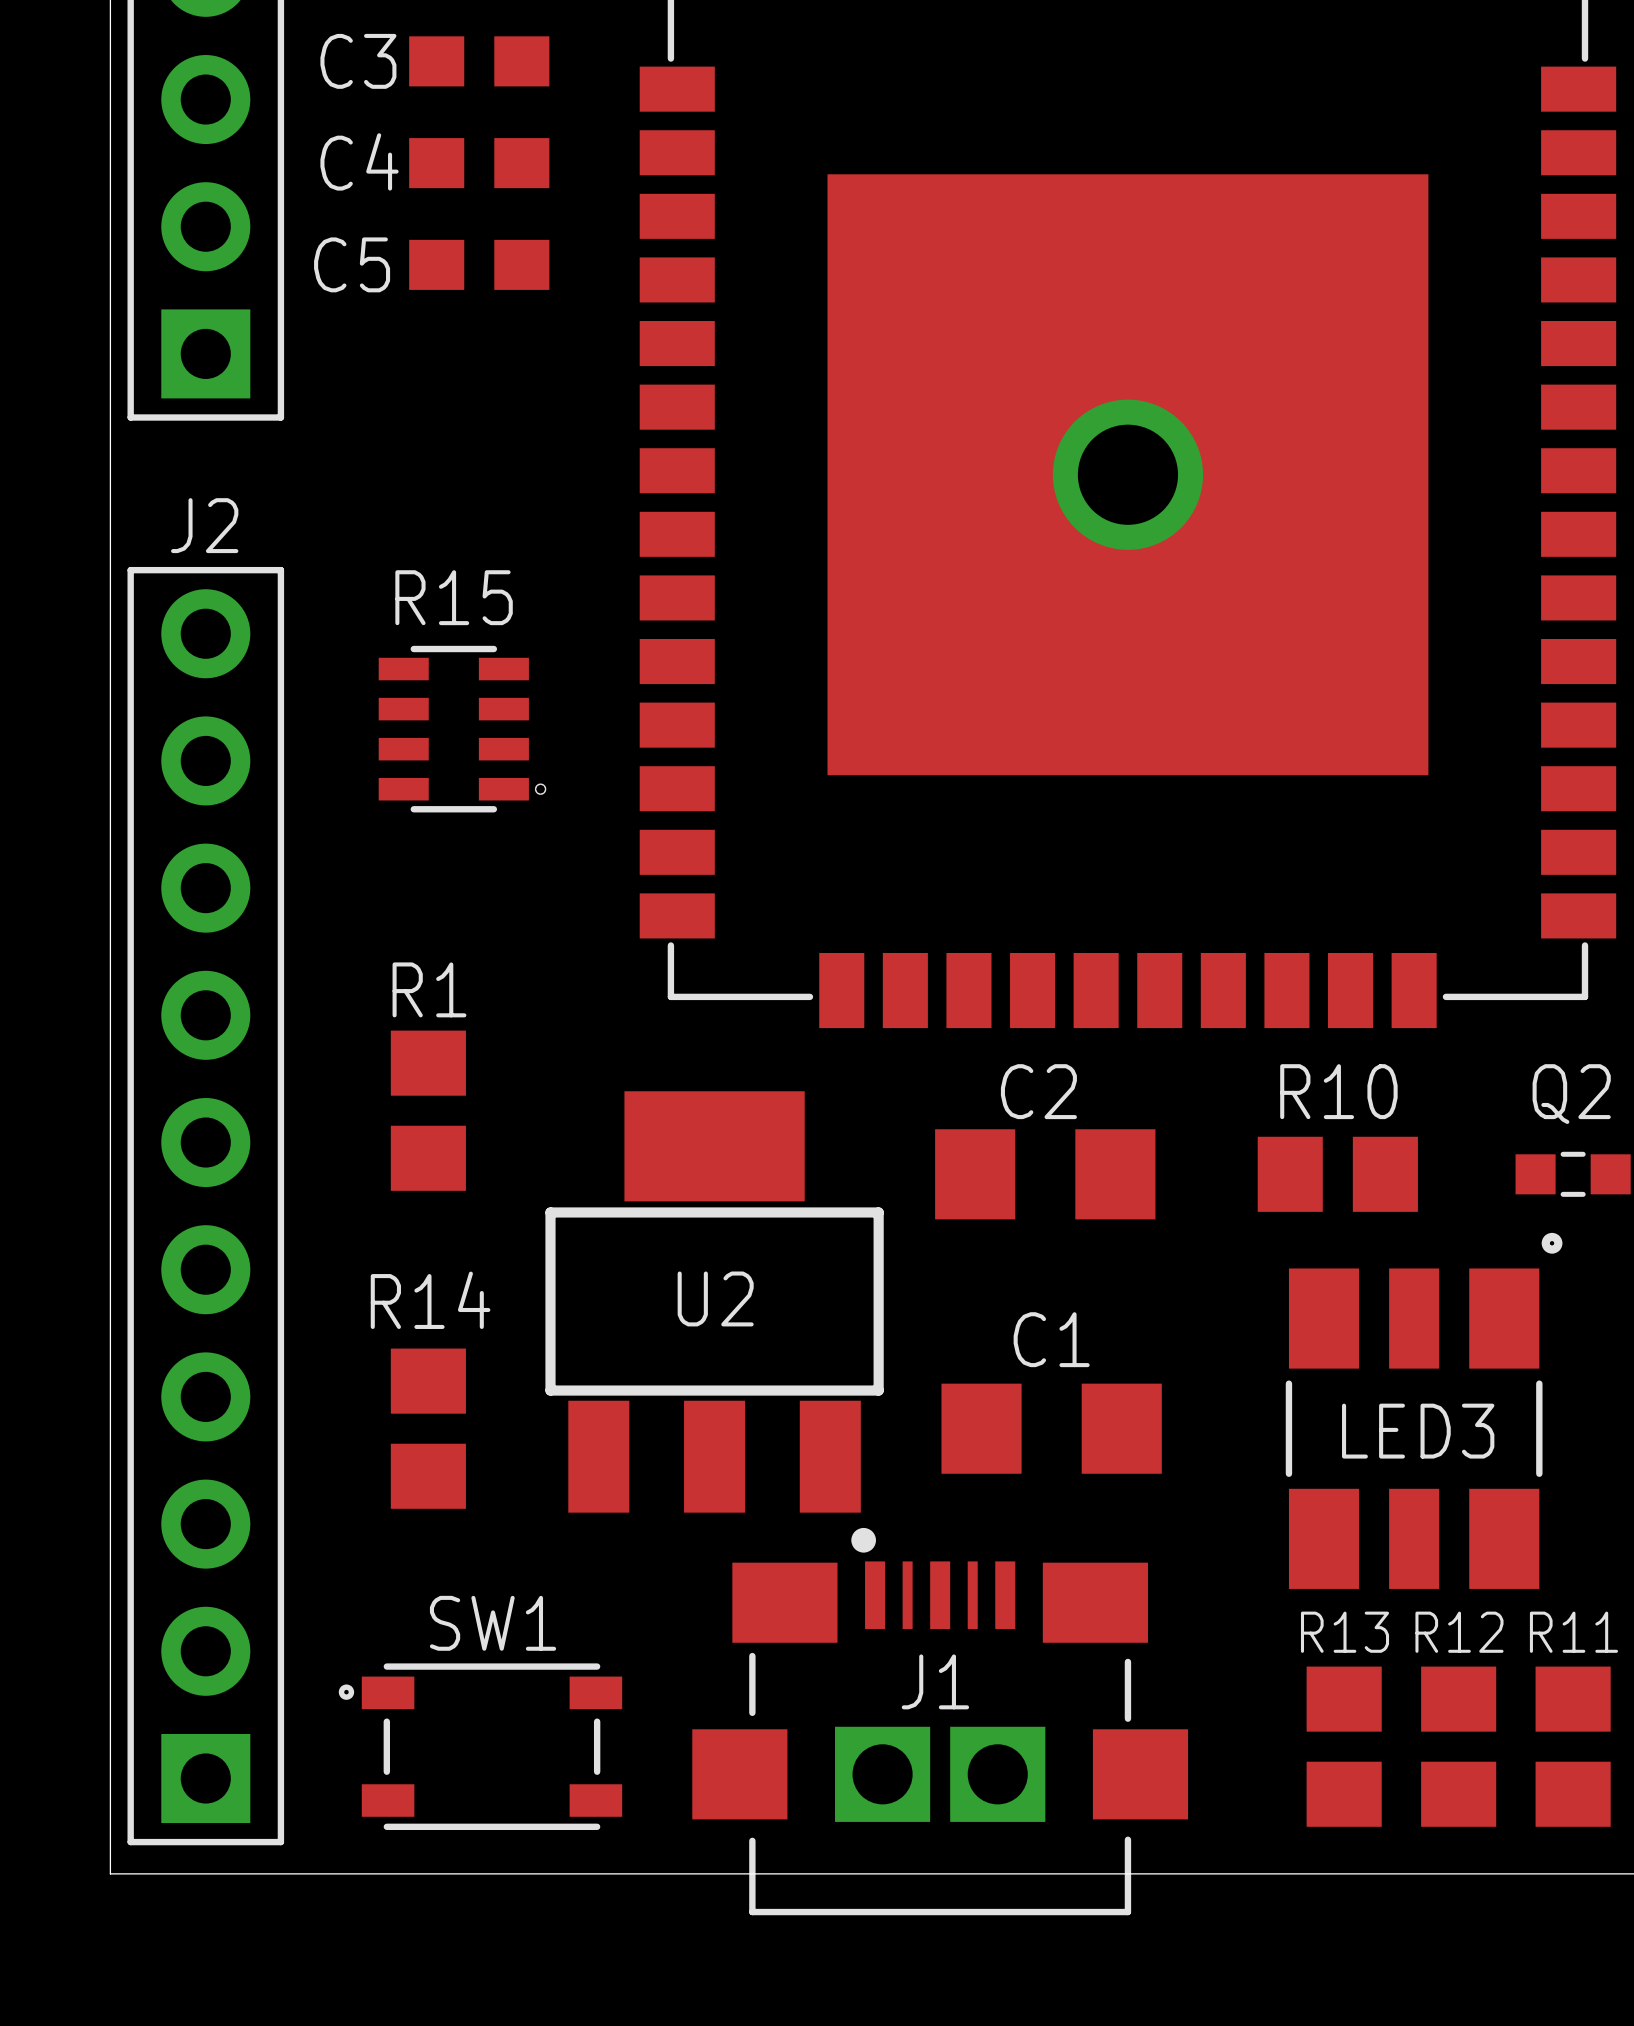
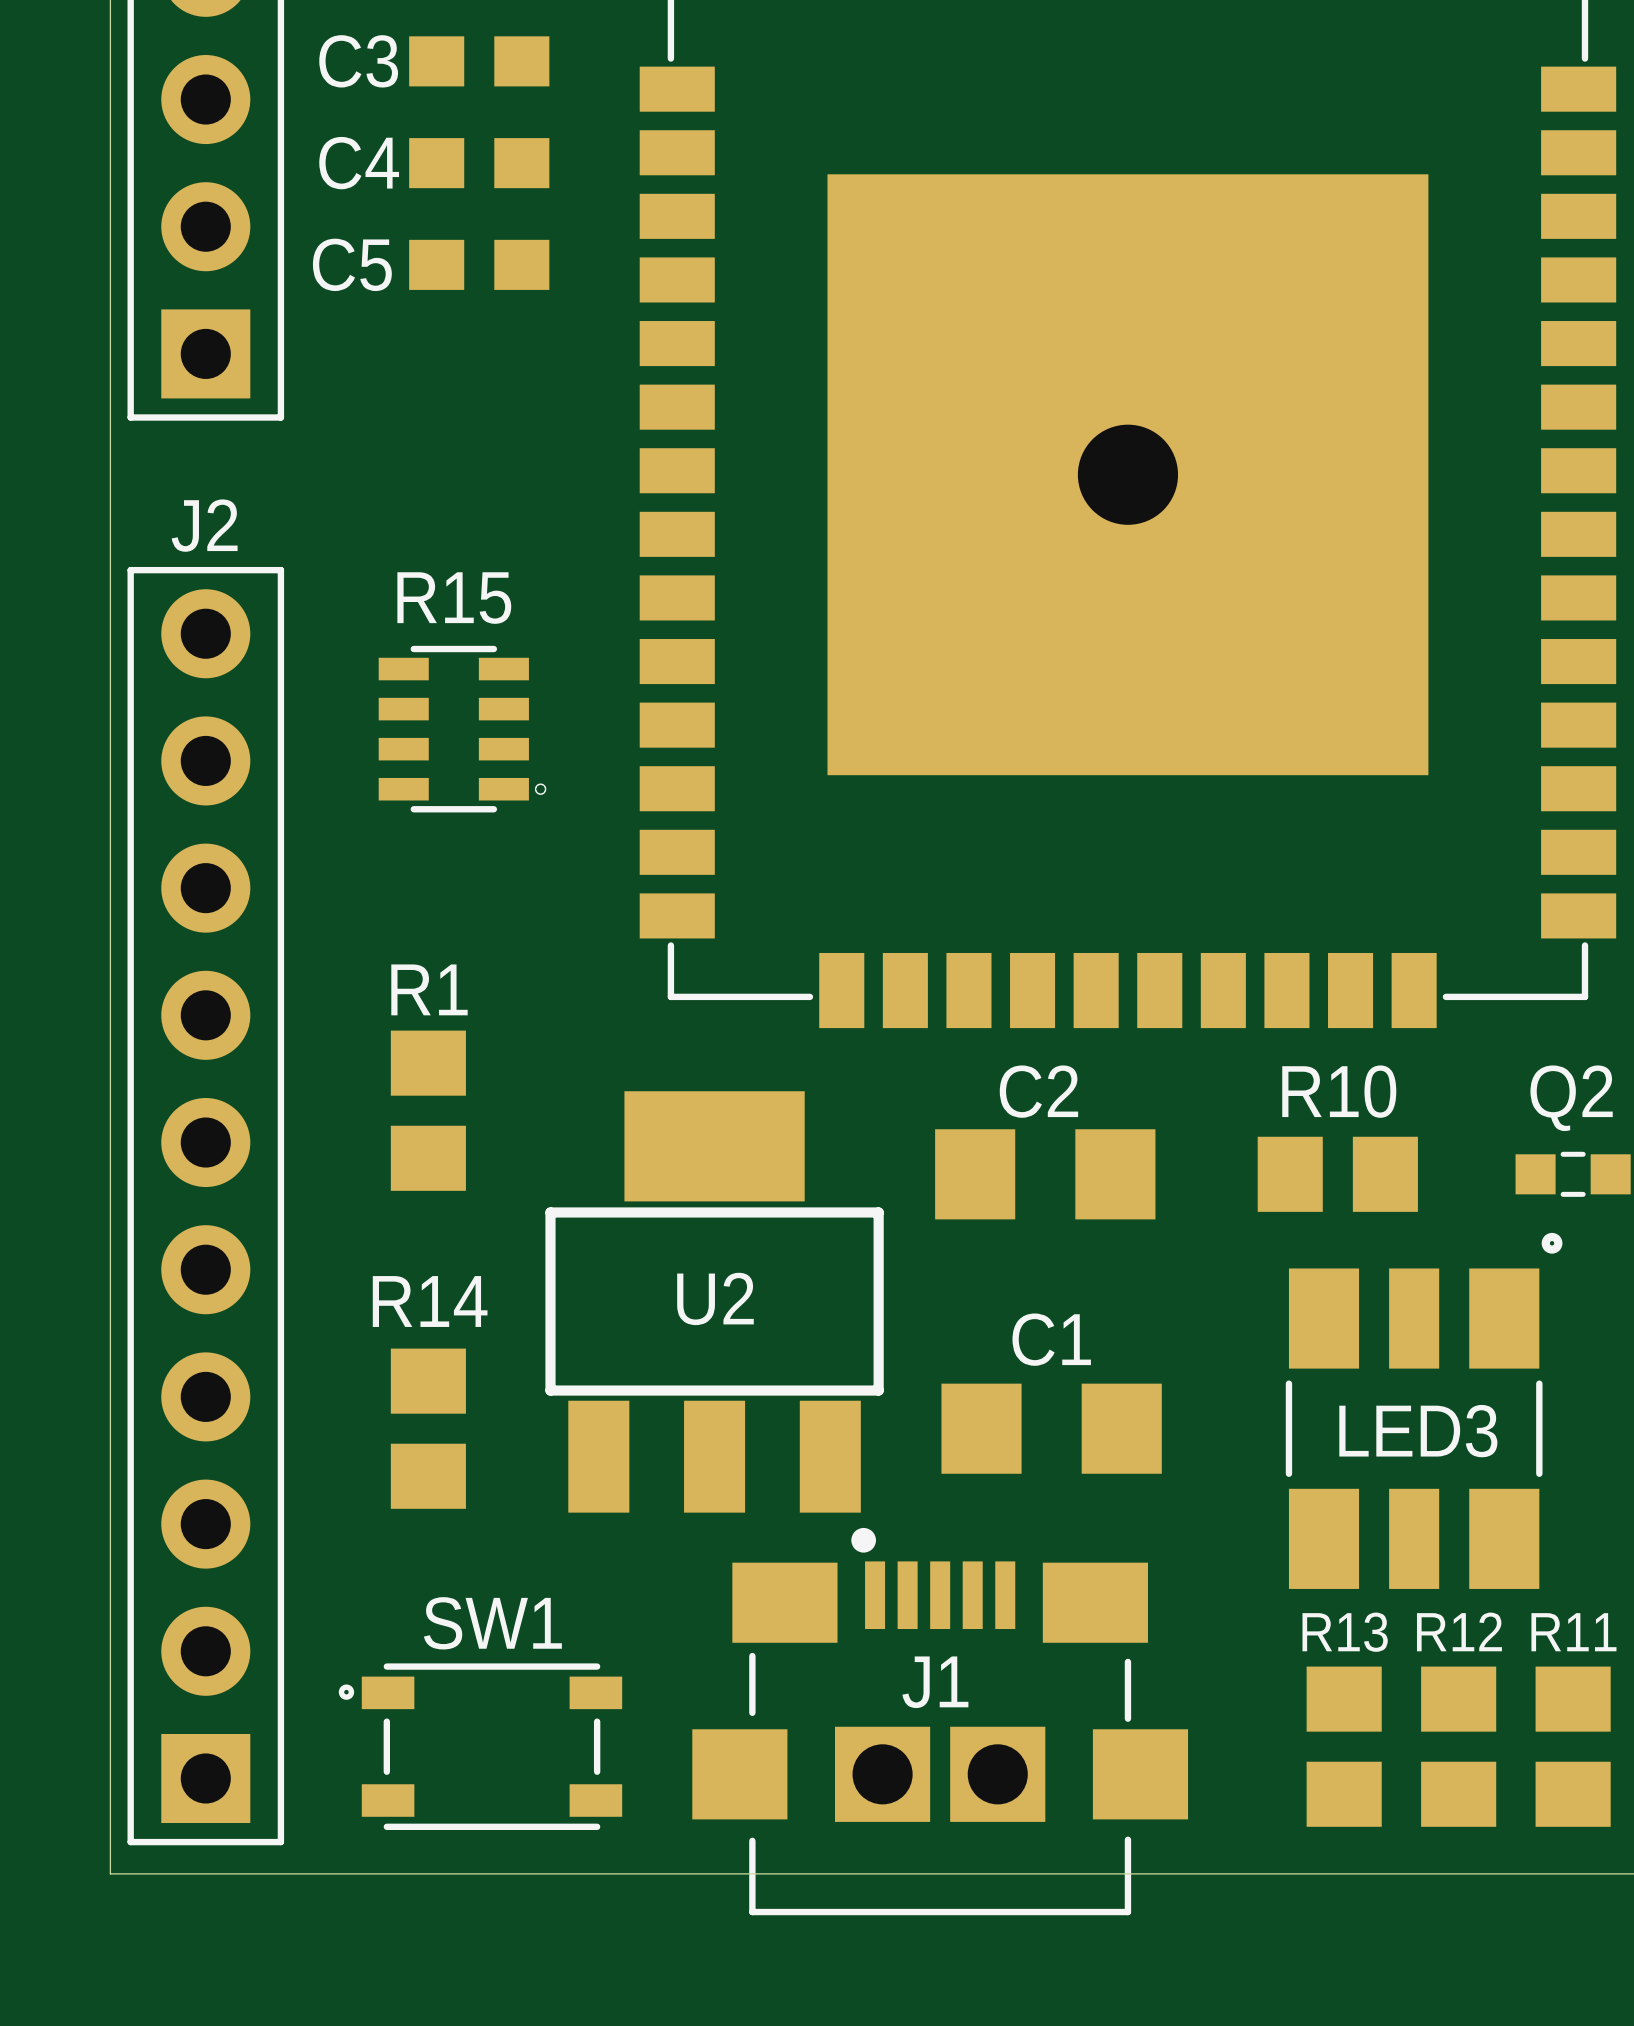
J1 footprint: [692, 1527, 1189, 1916] -> [692, 1527, 1189, 1916]

